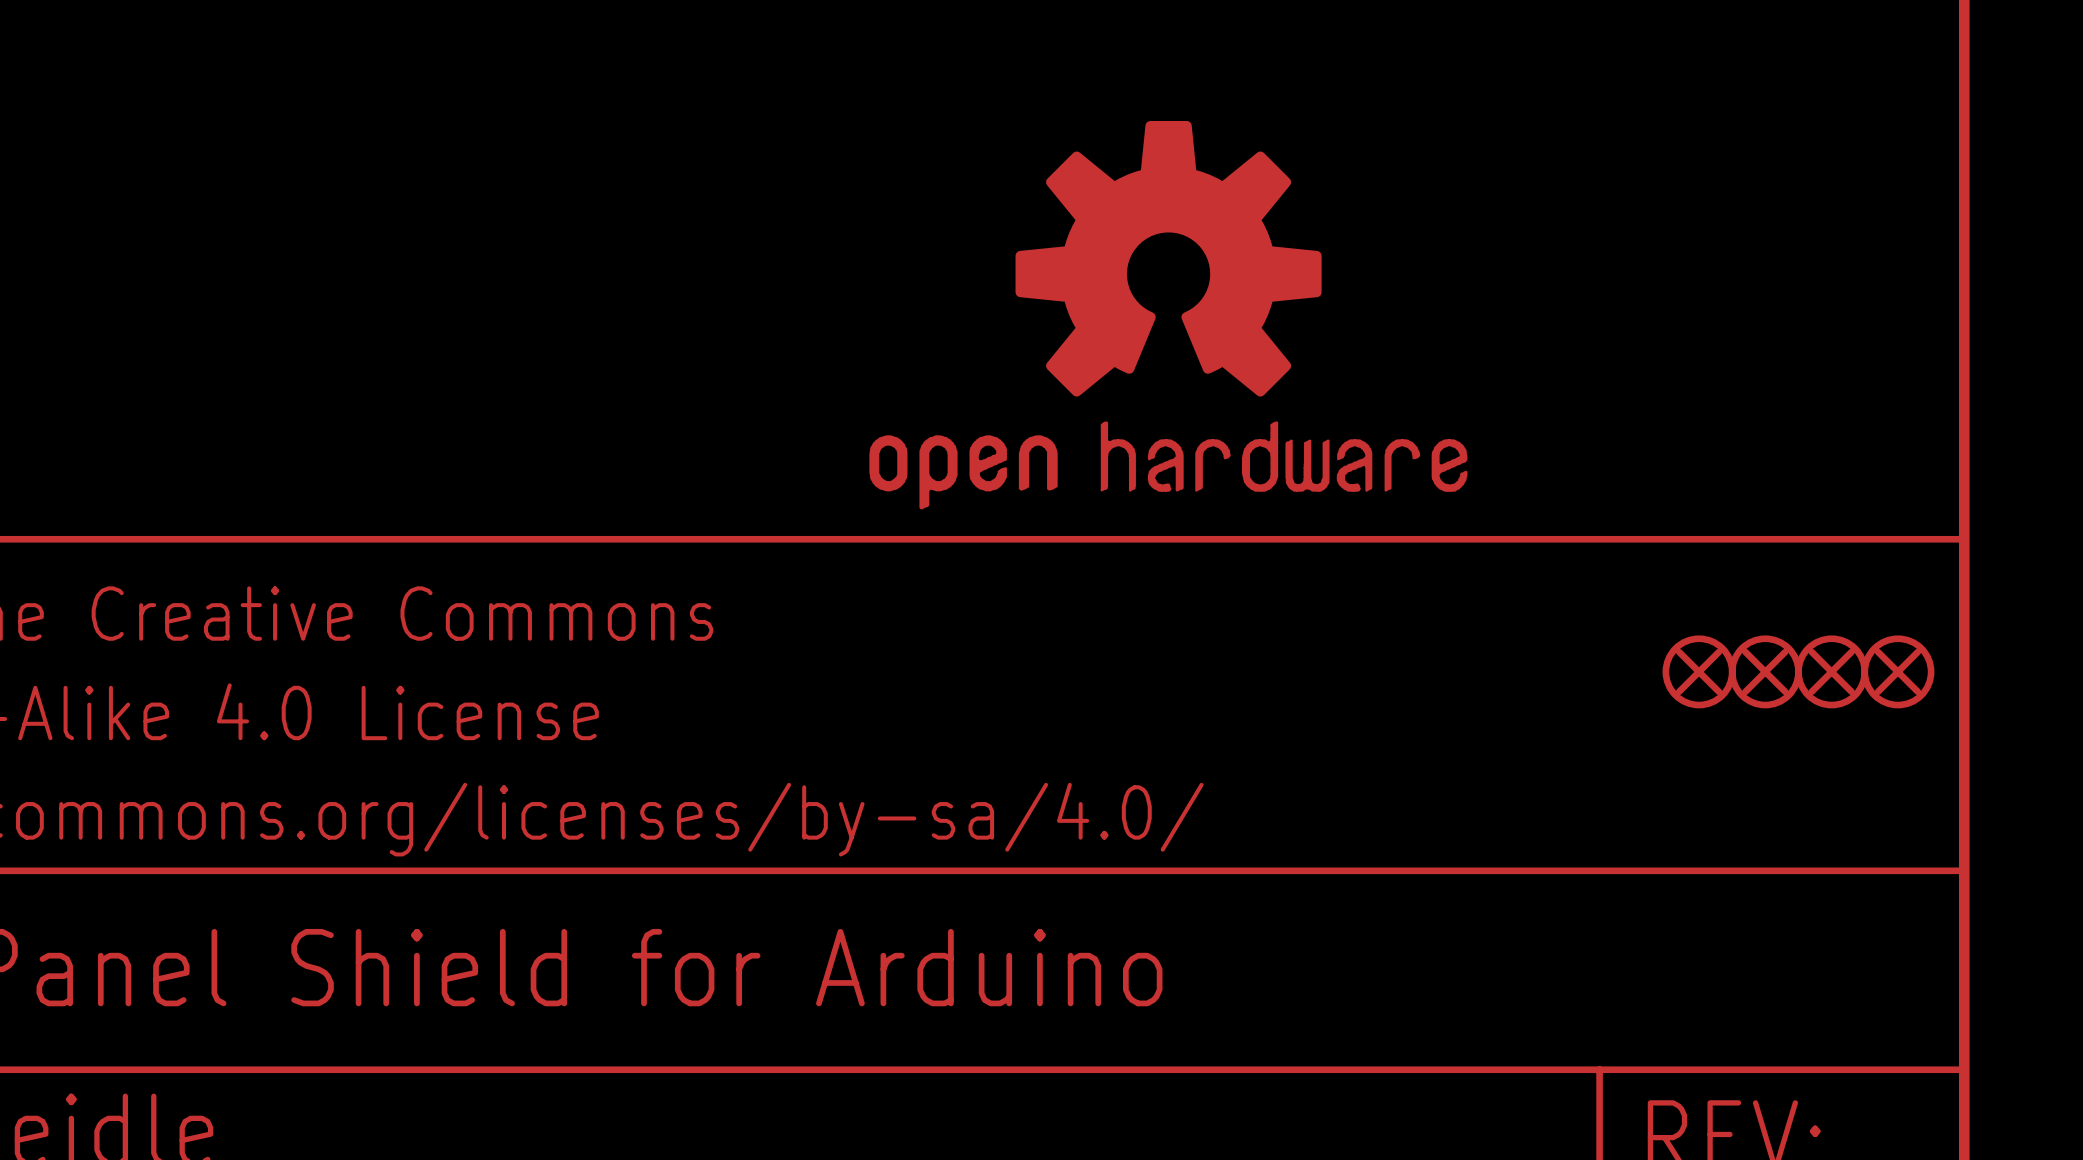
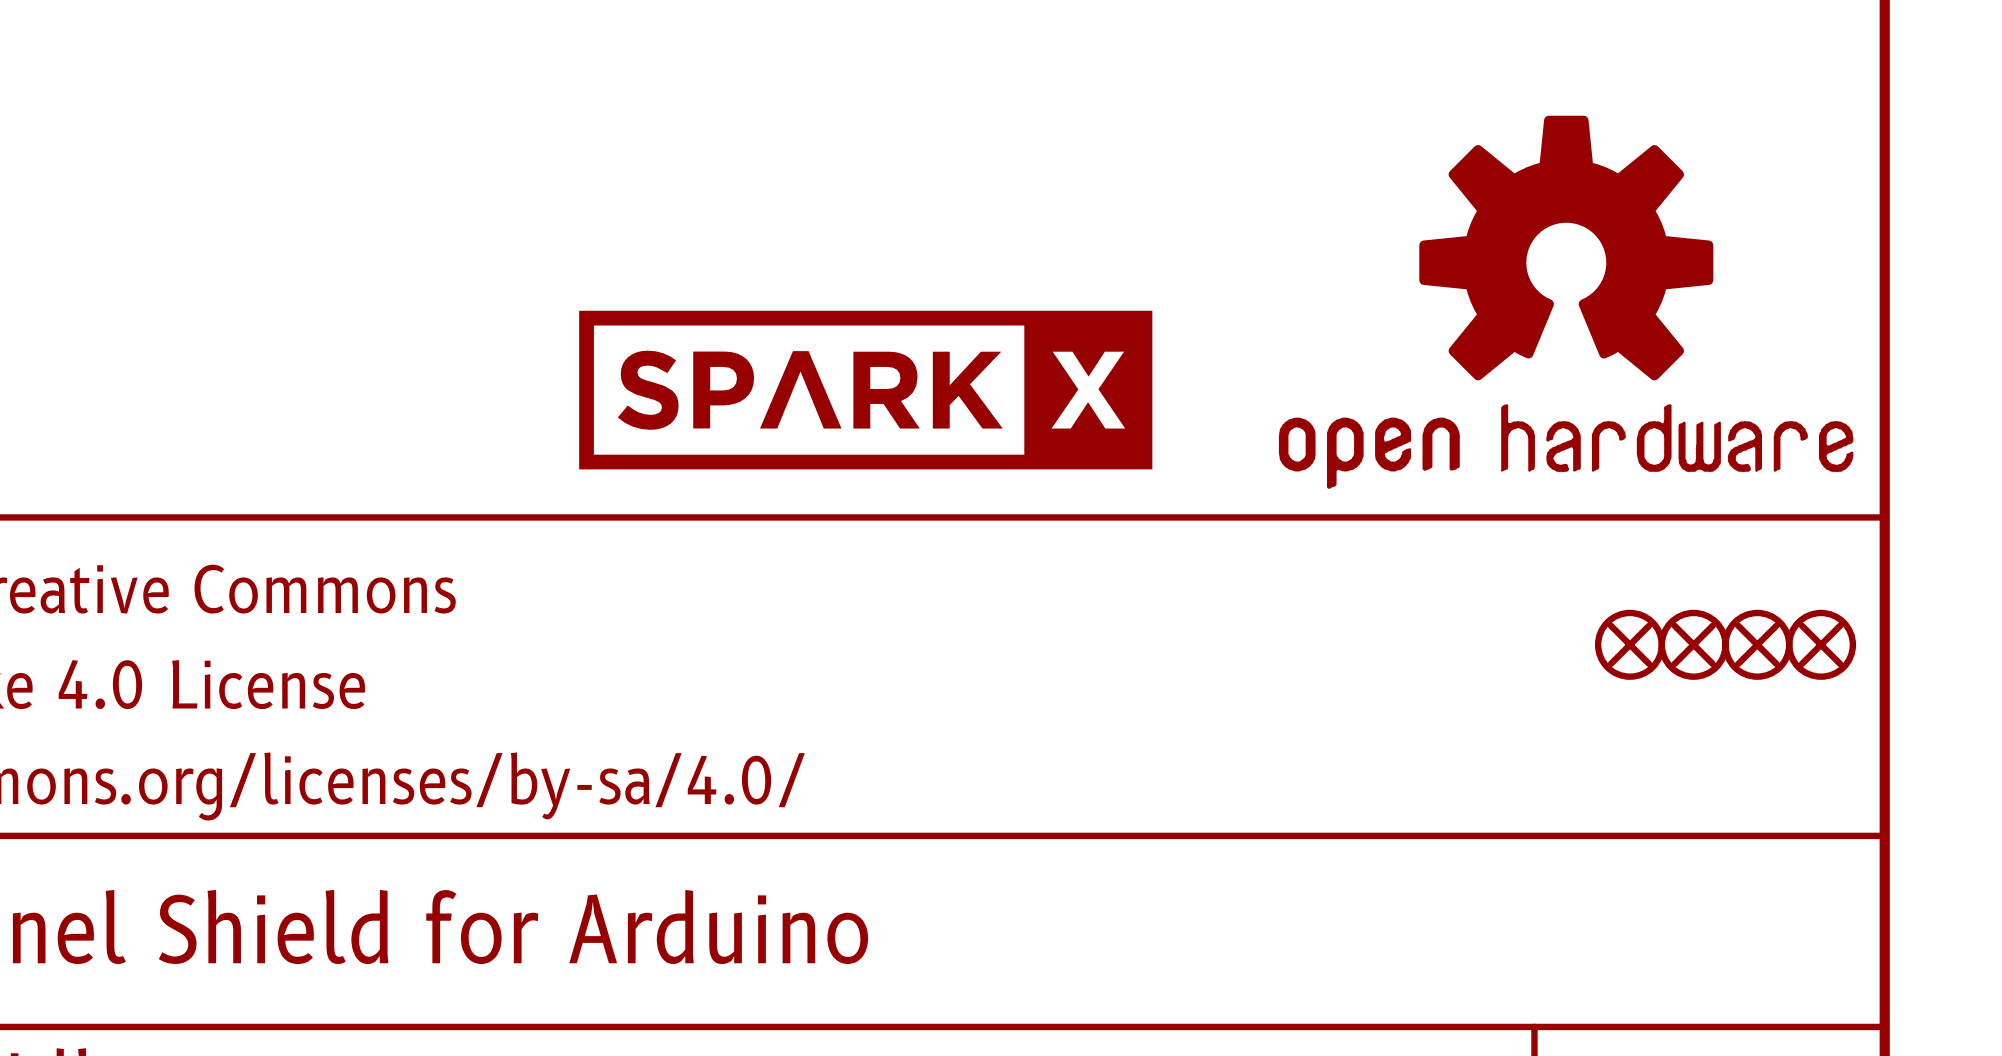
part position: (1168, 315) -> (1566, 302)
part: none -> (865, 390)

